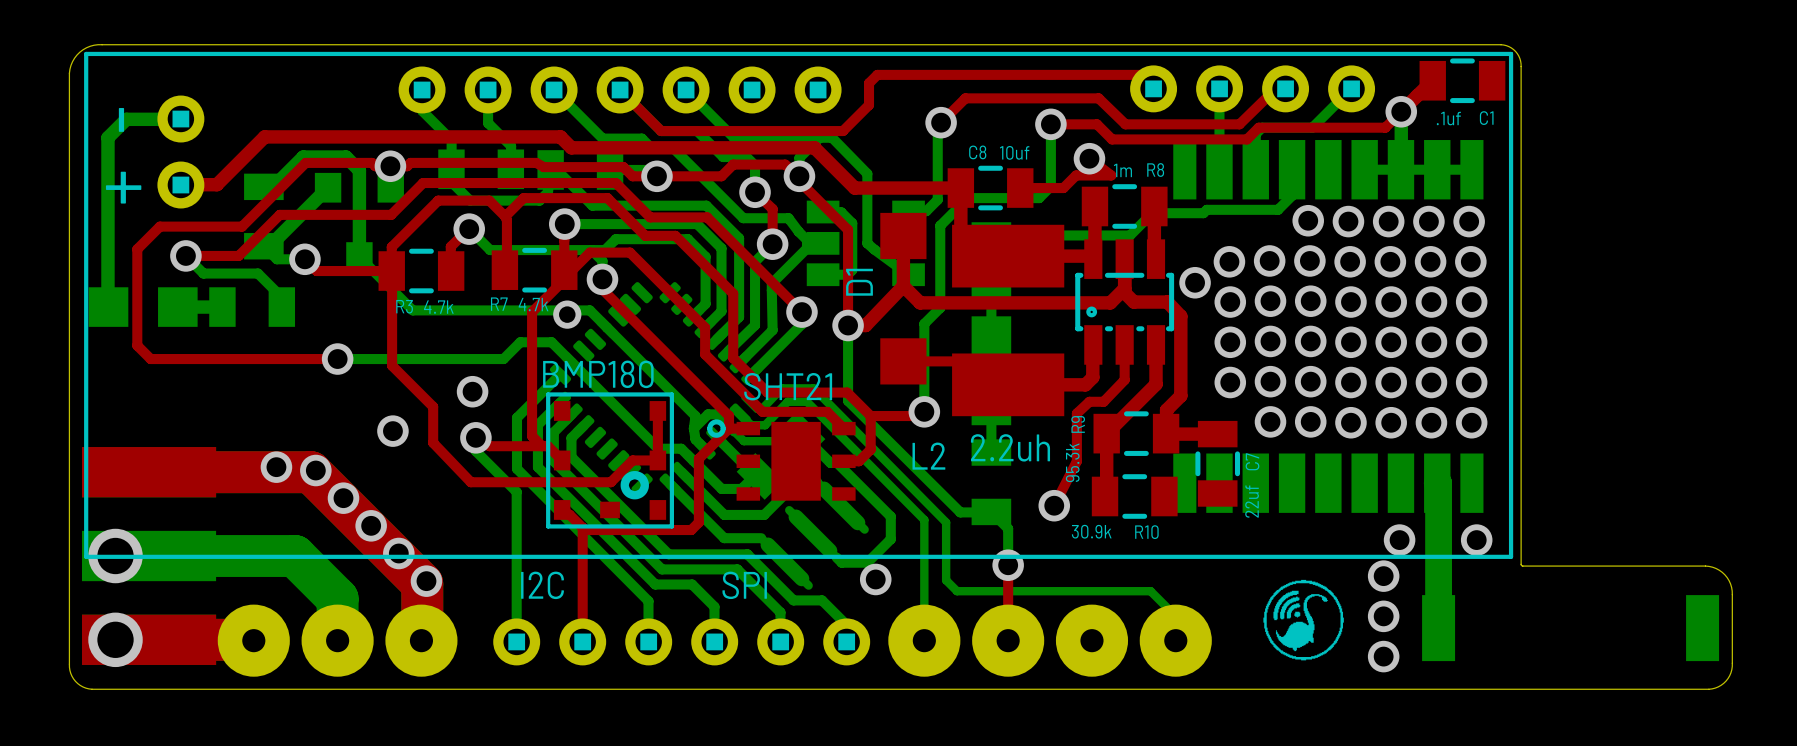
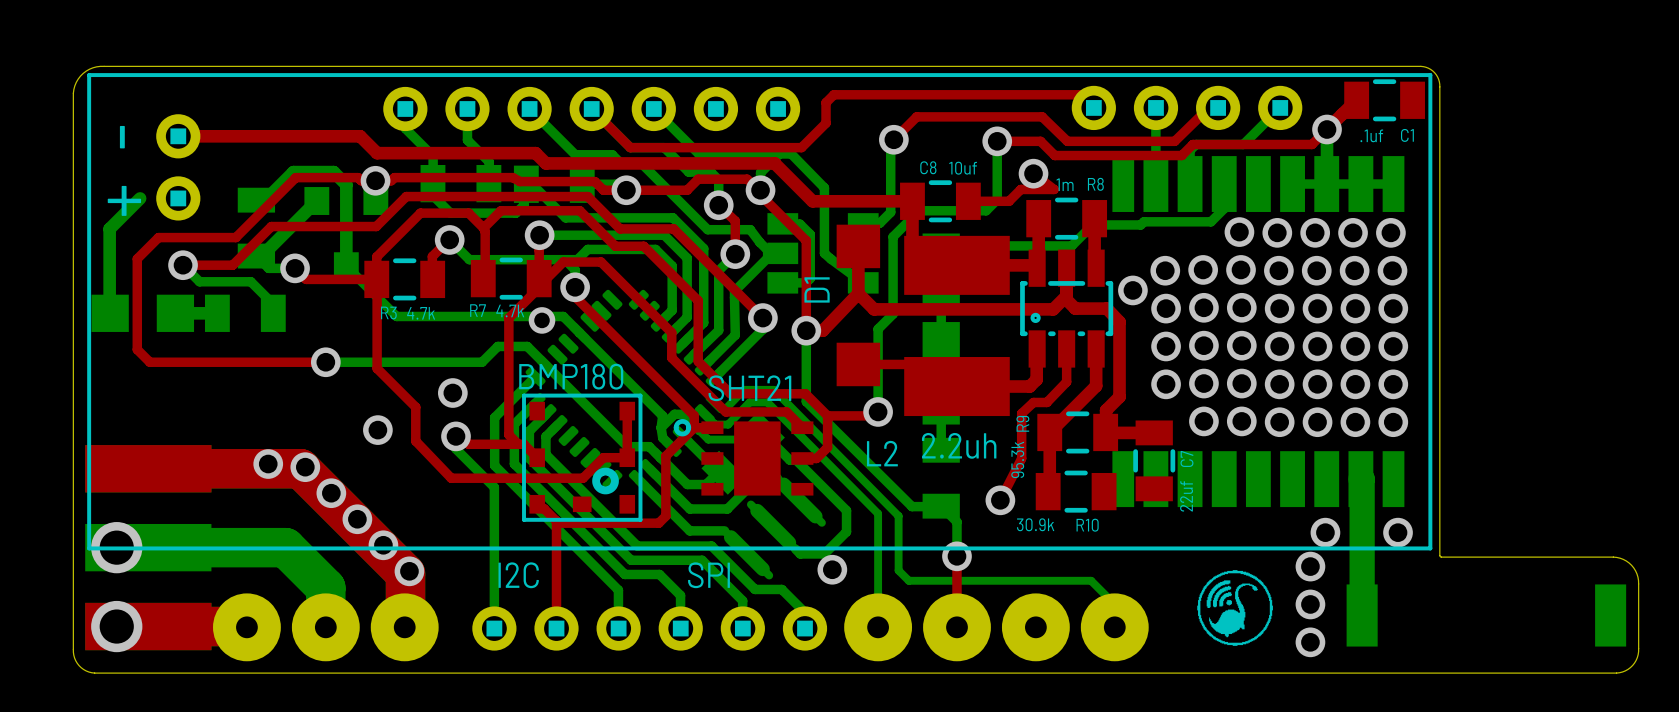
bottom track: (180, 119) (126, 119) (107, 137) (107, 217) -> (140, 198) (109, 228)
top track: (392, 136) (264, 136) (216, 184) (181, 184) -> (377, 153) (360, 136) (178, 136)

